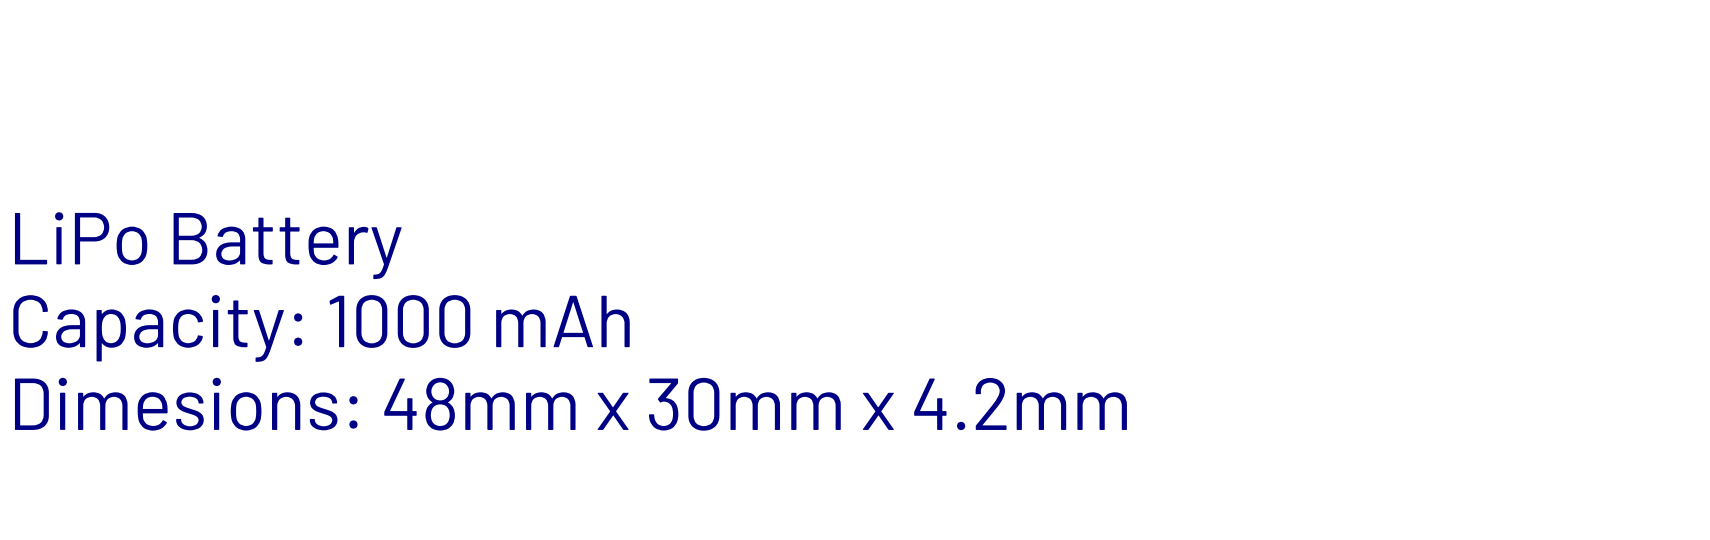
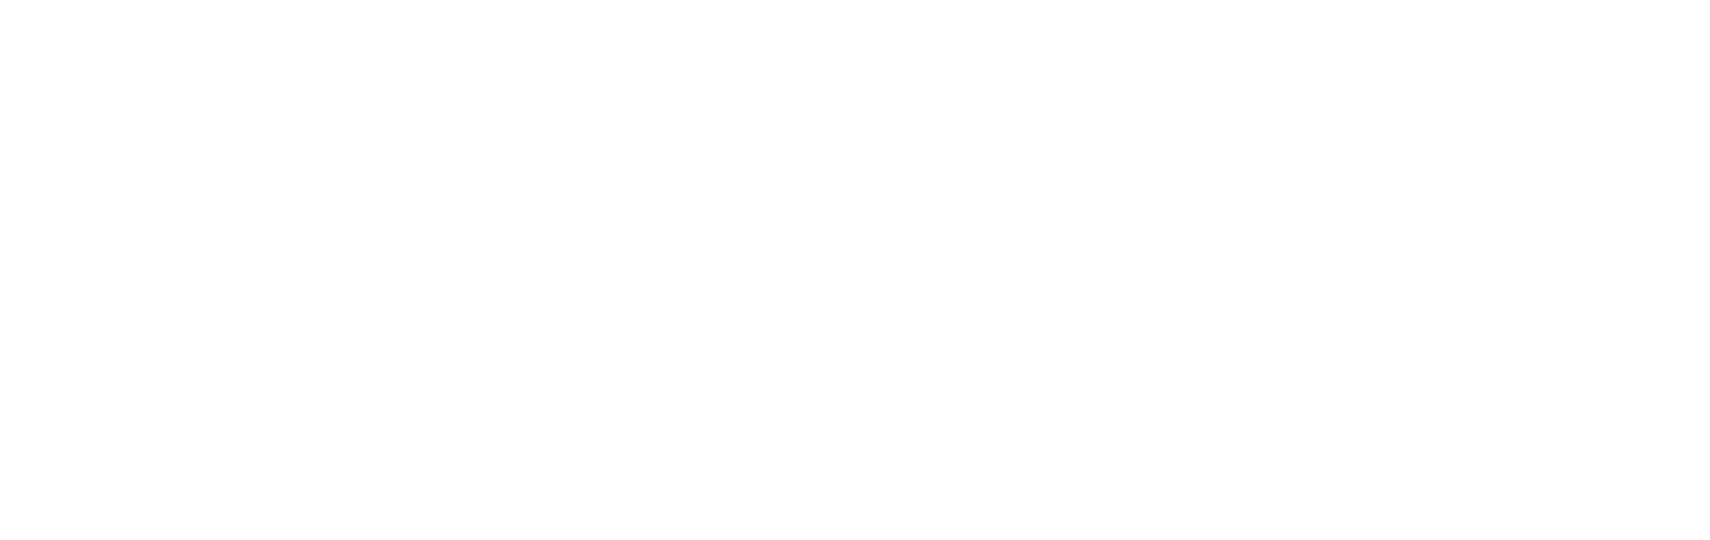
text: LiPo Battery (208, 245) -> none
text: Capacity: 1000 mAh (321, 328) -> none
text: Dimesions: 48mm x 30mm x 4.2mm (570, 404) -> none

